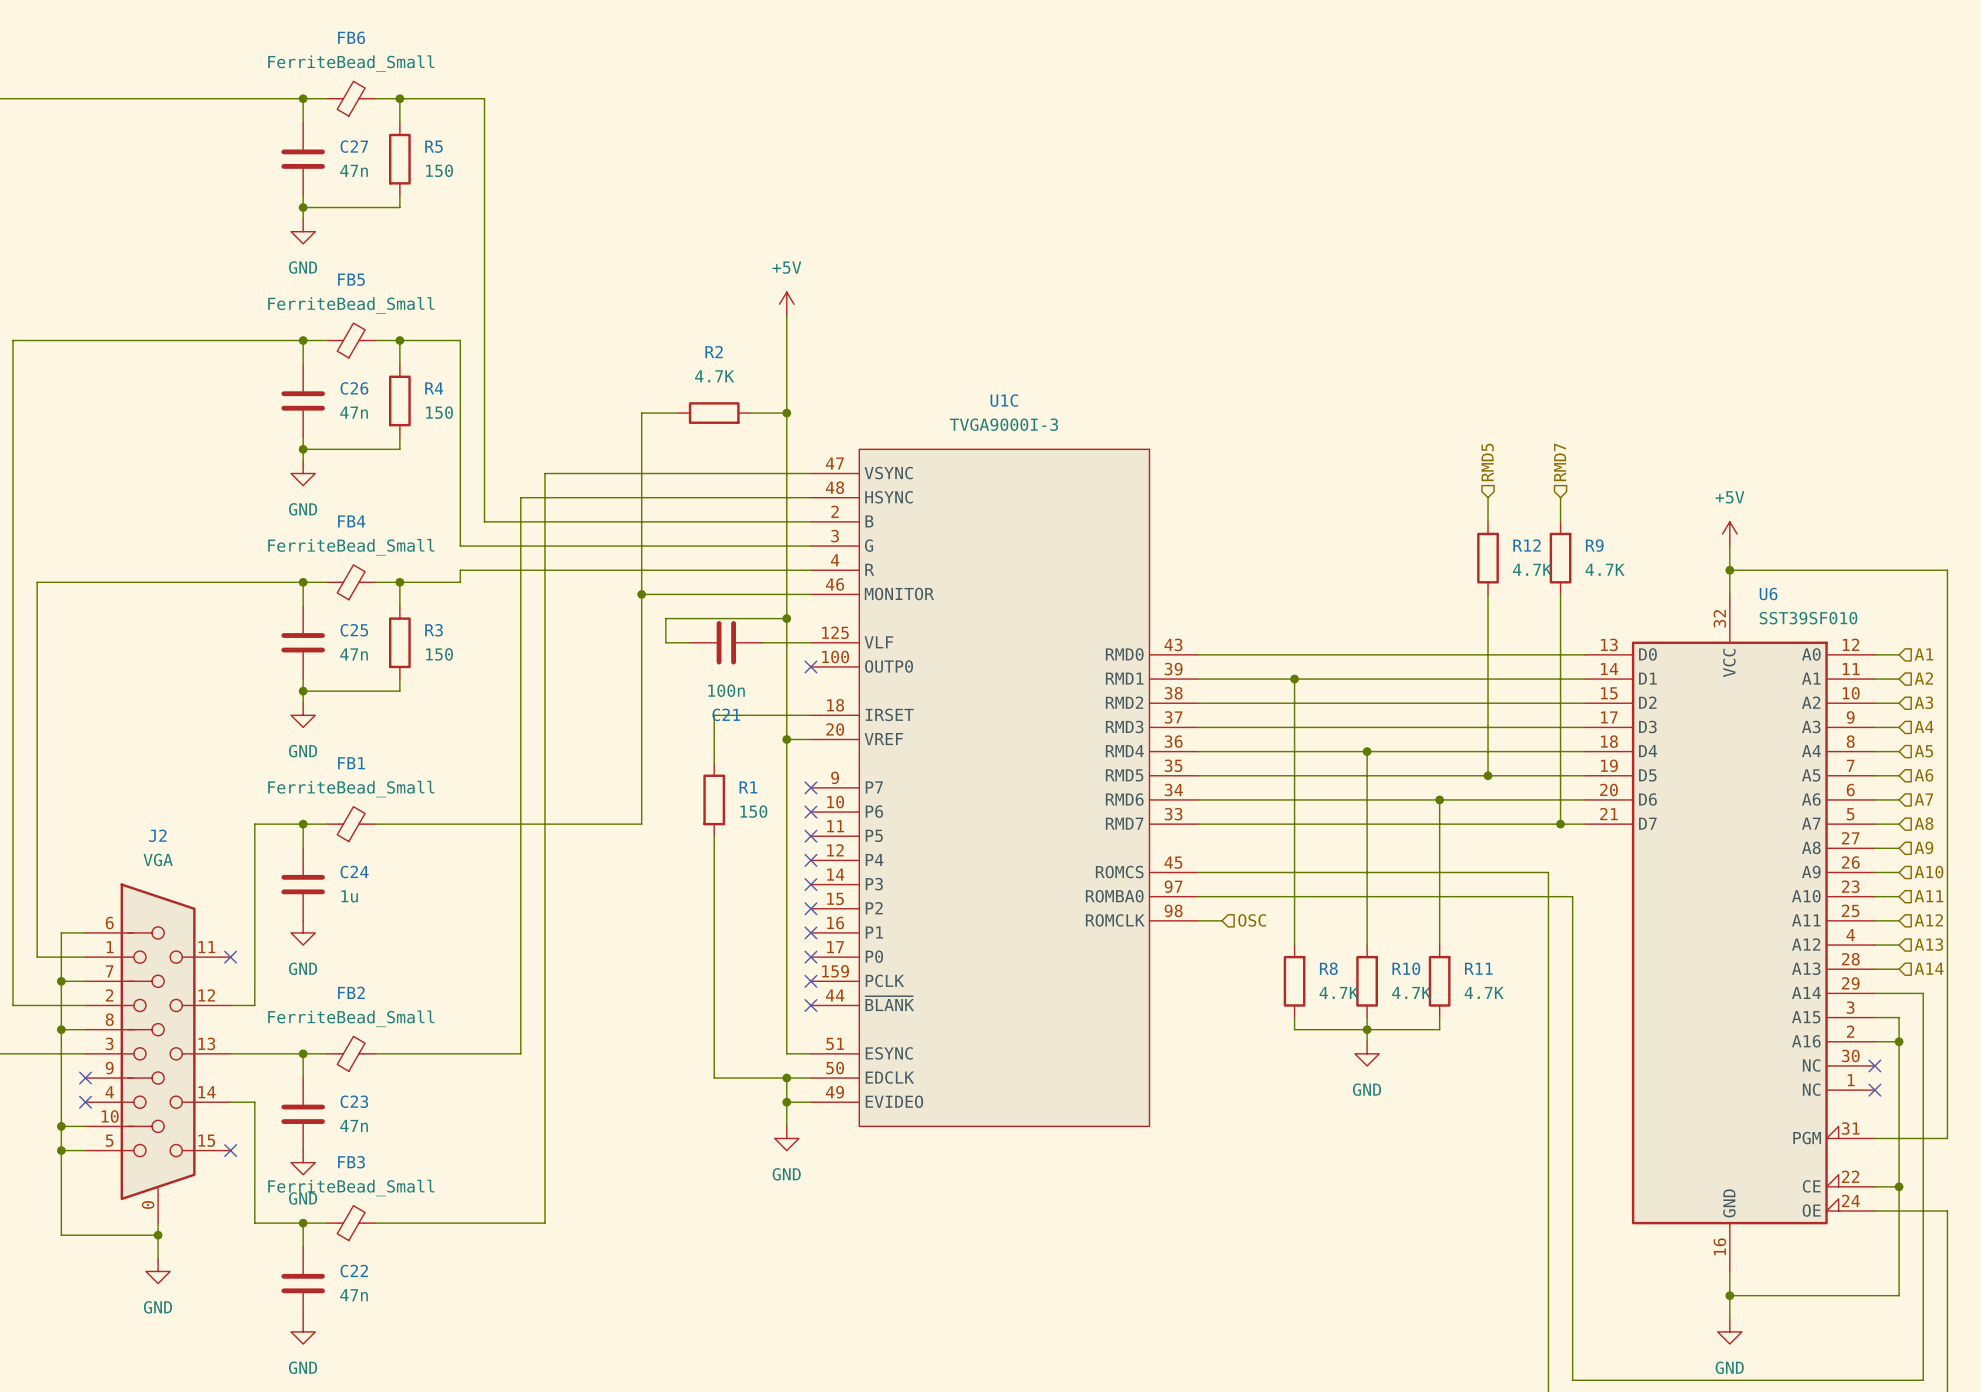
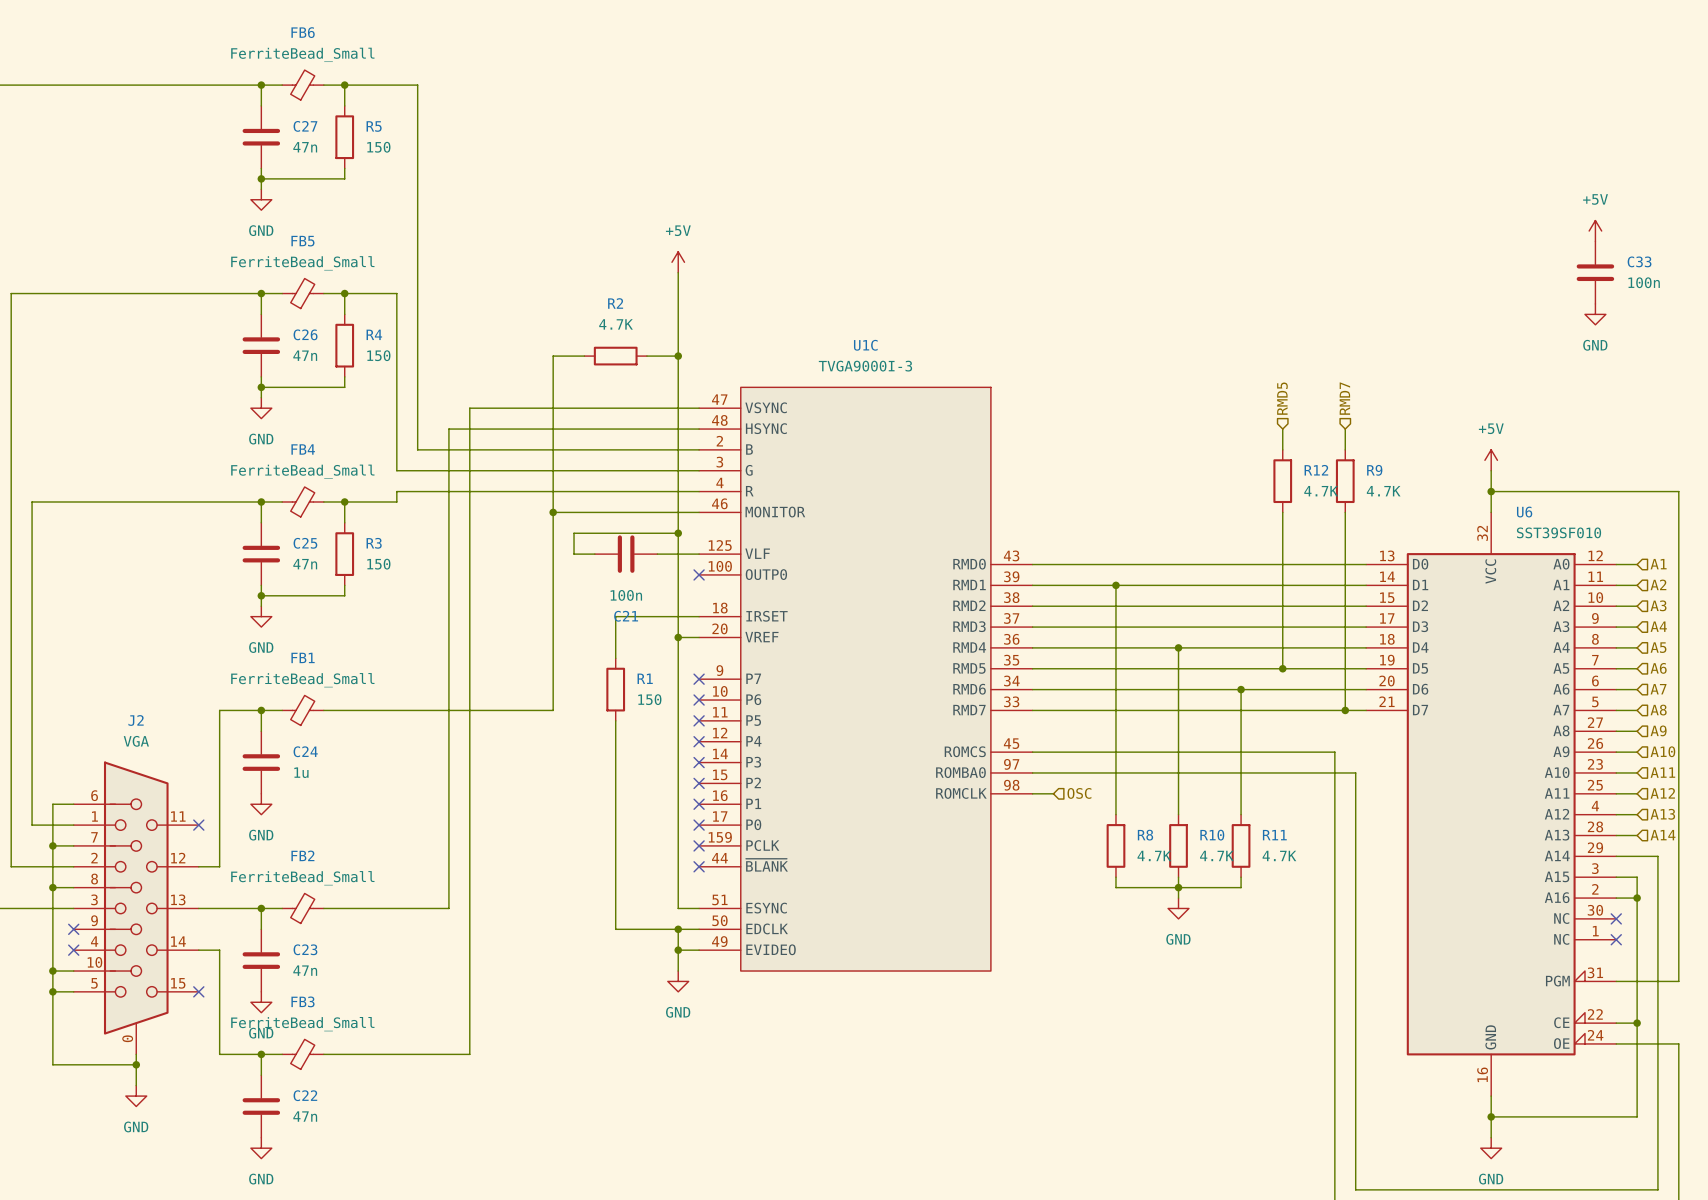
power symbol: none -> +5V (1595, 231)
C33: none -> 100n (1595, 272)
power symbol: none -> GND (1595, 314)

